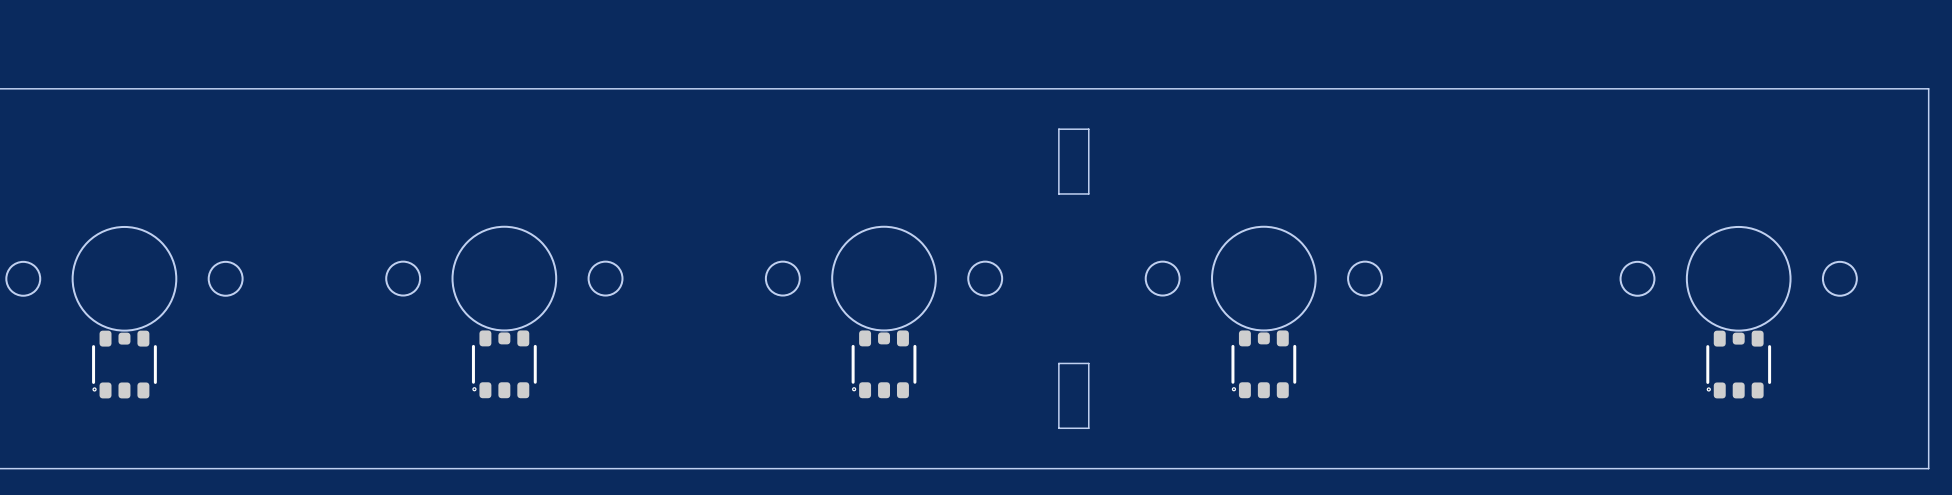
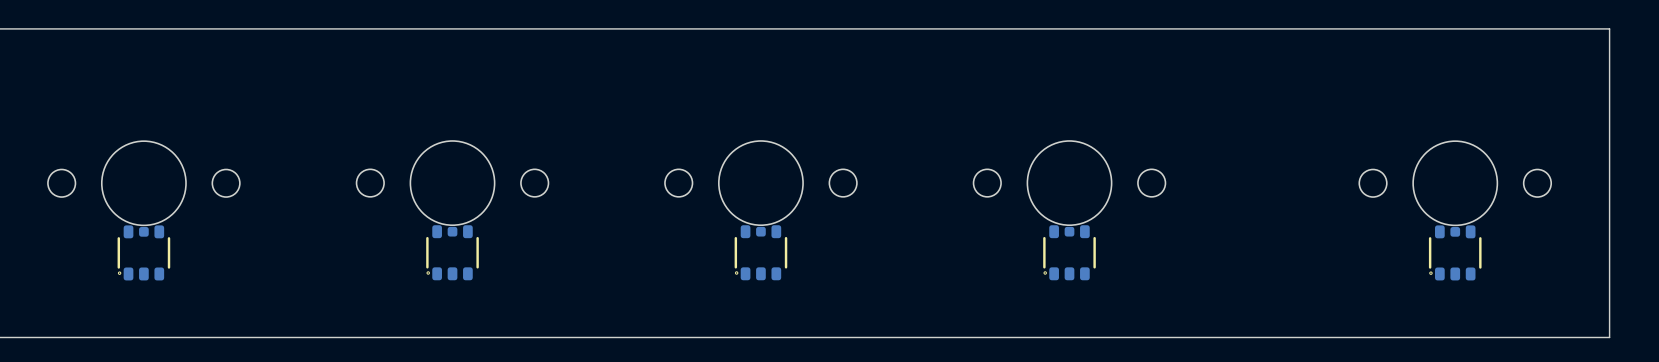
board edge: (1088, 129) (1058, 129) (1058, 193) (1088, 193) (1088, 129) -> none
board edge: (1088, 363) (1088, 428) (1058, 428) (1058, 363) (1088, 363) -> none

